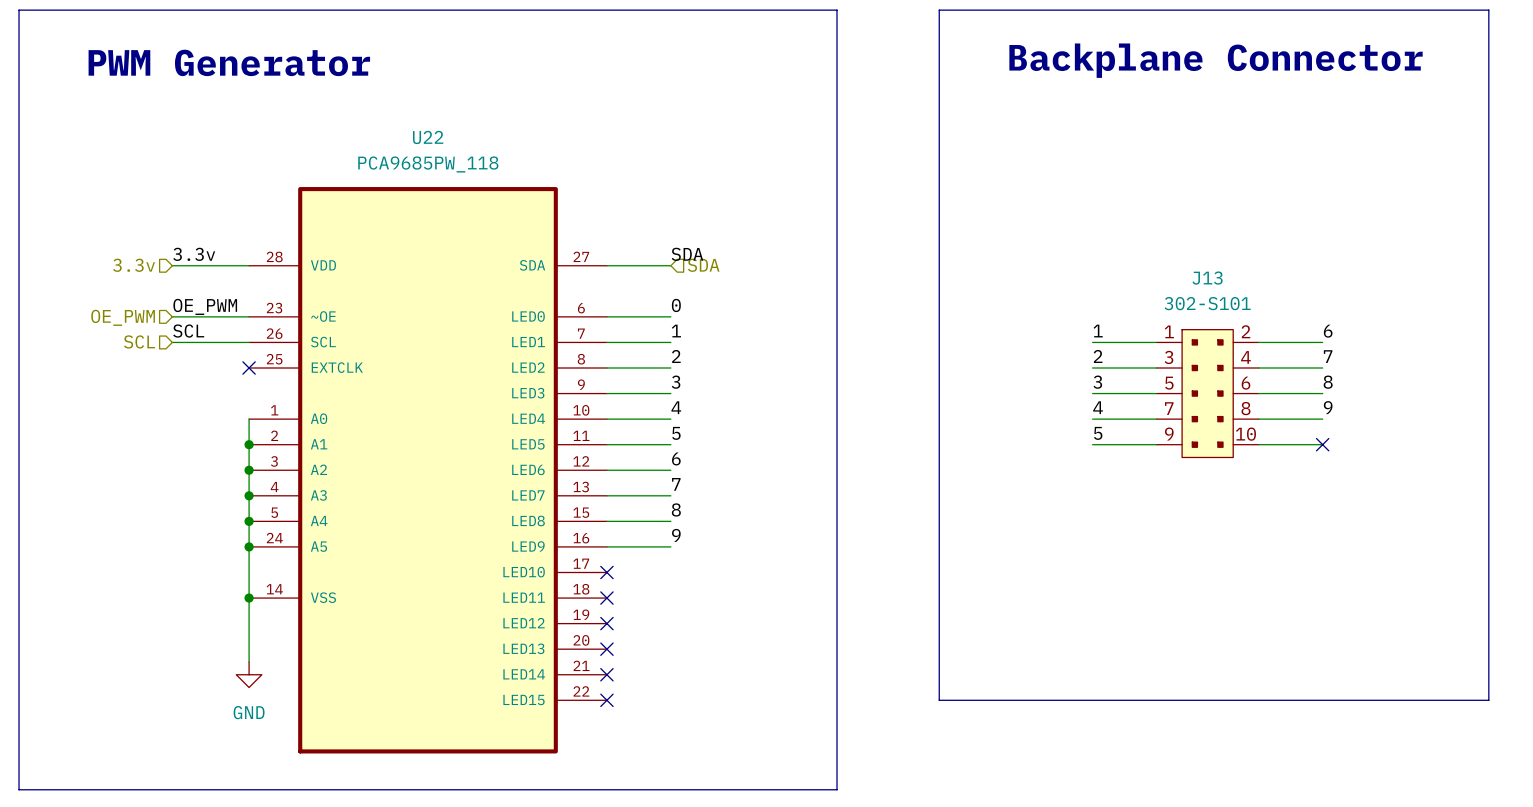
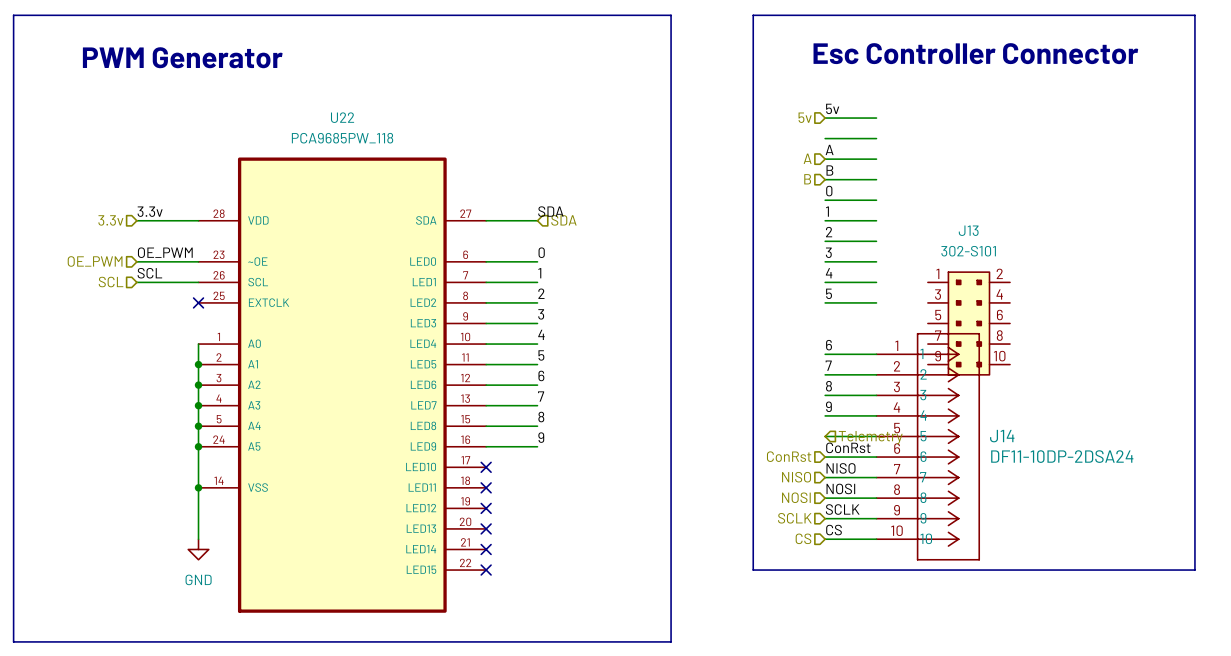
text: Backplane Connector (1216, 60) -> Esc Controller Connector (975, 53)
label: none -> 5v (832, 108)
hierarchical label: none -> 5v (805, 117)
wire: none -> (825, 118) (876, 118)
wire: none -> (825, 138) (876, 138)
label: none -> A (829, 149)
hierarchical label: none -> A (807, 158)
wire: none -> (825, 159) (876, 159)
label: none -> B (829, 170)
hierarchical label: none -> B (807, 179)
wire: none -> (825, 179) (876, 179)
label: none -> 0 (829, 191)
wire: none -> (825, 200) (876, 200)
label position: 1 (1098, 331) -> 1 (827, 211)
label: 6 (1328, 331) -> none
wire: (1092, 342) (1156, 342) -> (876, 282) (825, 282)
wire: (1258, 342) (1322, 342) -> (825, 220) (876, 220)
label position: 2 (1098, 356) -> 2 (829, 232)
label: 7 (1328, 356) -> none
wire: (1092, 368) (1156, 368) -> (876, 302) (825, 302)
wire: (1258, 368) (1322, 368) -> (825, 241) (876, 241)
label position: 3 (1097, 382) -> 3 (828, 252)
label: 8 (1328, 382) -> none
wire: (1092, 393) (1156, 393) -> (825, 261) (876, 261)
wire: (1258, 393) (1322, 393) -> (825, 395) (876, 395)
label position: 4 (1098, 407) -> 4 (829, 273)
label: 9 (1328, 407) -> none
wire: (1092, 419) (1156, 419) -> (825, 415) (876, 415)
wire: (1258, 419) (1322, 419) -> (825, 374) (876, 374)
label: none -> 6 (829, 345)
label position: 5 (1098, 433) -> 5 (829, 293)
wire: (1092, 444) (1156, 444) -> (825, 436) (876, 436)
wire: (1258, 444) (1322, 444) -> (825, 354) (876, 354)
no-connect mark: (1322, 444) -> none
label: none -> 7 (828, 365)
label: none -> 8 (828, 386)
label: none -> 9 (828, 406)
hierarchical label: none -> Telemetry (870, 437)
J14: none -> DF11-10DP-2DSA24 (928, 446)
label: none -> ConRst (848, 447)
hierarchical label: none -> ConRst (789, 456)
wire: none -> (825, 457) (876, 457)
label: none -> NISO (841, 468)
hierarchical label: none -> NISO (796, 477)
wire: none -> (825, 477) (876, 477)
label: none -> NOSI (840, 488)
hierarchical label: none -> NOSI (796, 497)
wire: none -> (825, 498) (876, 498)
label: none -> SCLK (842, 509)
hierarchical label: none -> SCLK (794, 518)
wire: none -> (825, 518) (876, 518)
label: none -> CS (834, 530)
hierarchical label: none -> CS (803, 538)
wire: none -> (825, 539) (876, 539)

